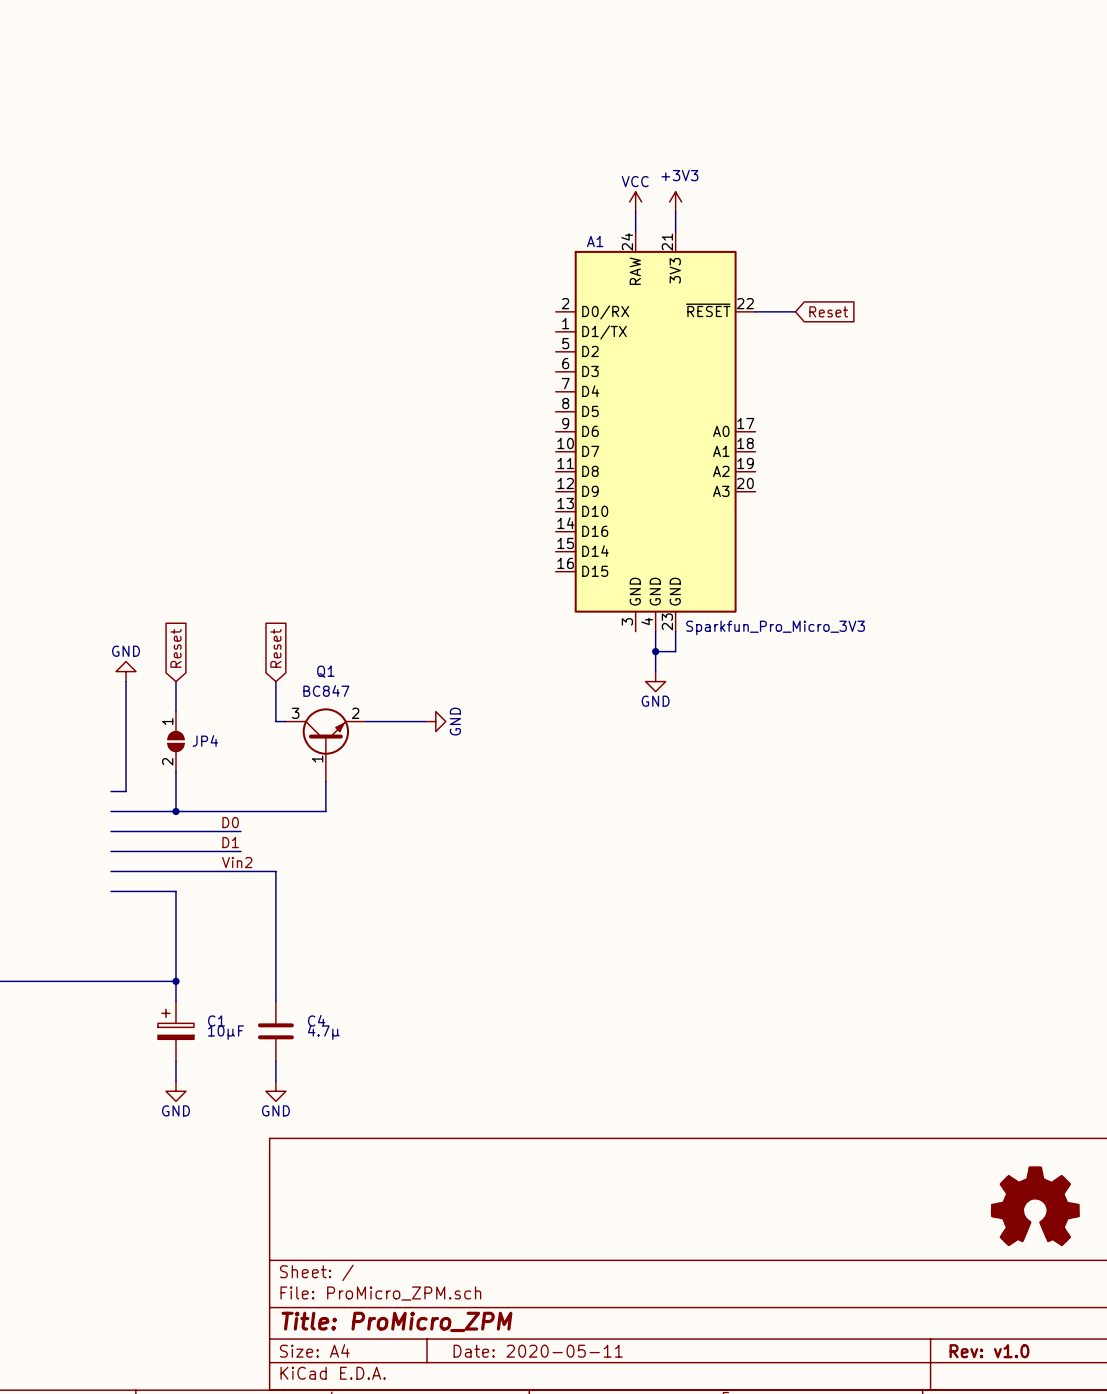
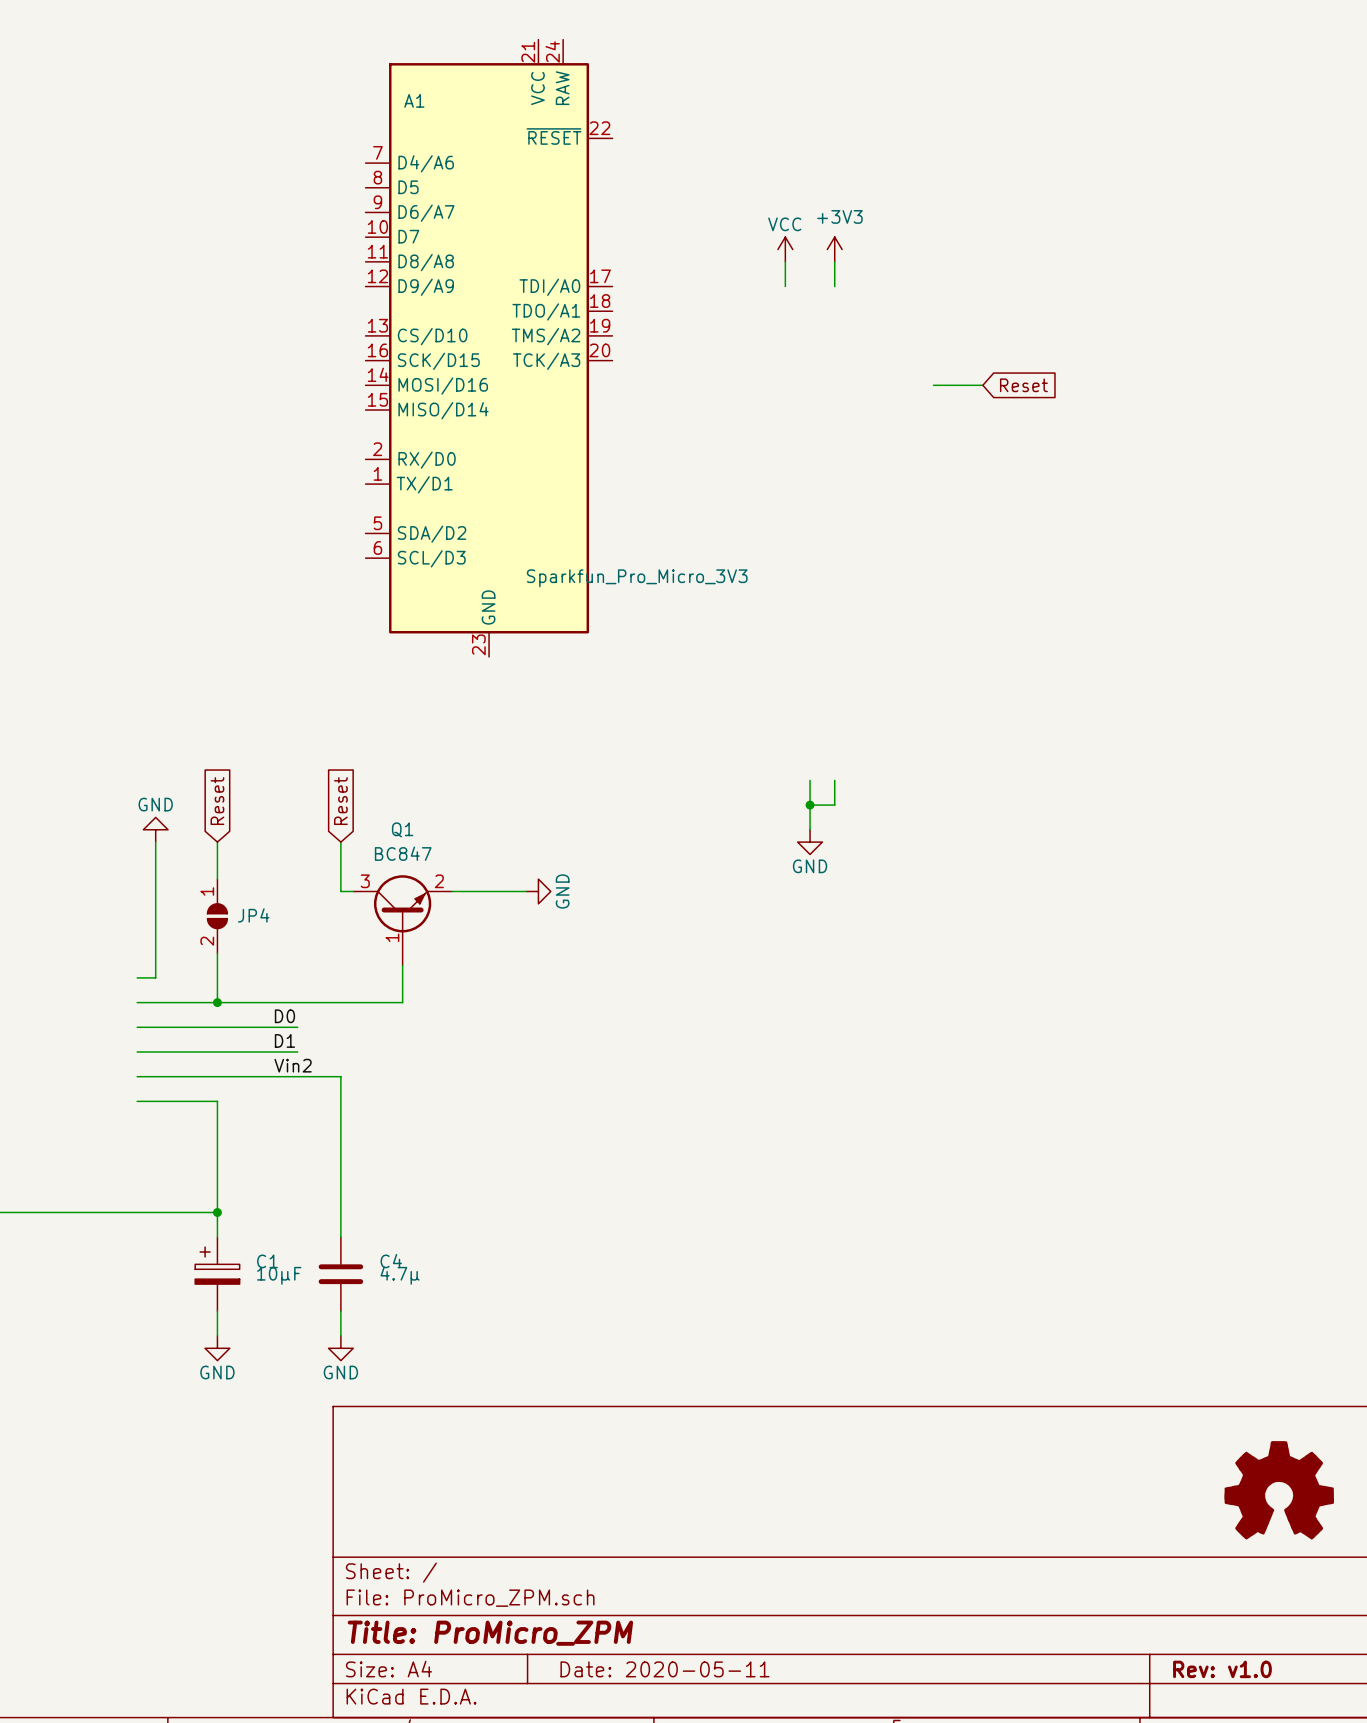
A1 symbol: [555, 231, 756, 632] -> [365, 39, 613, 657]

